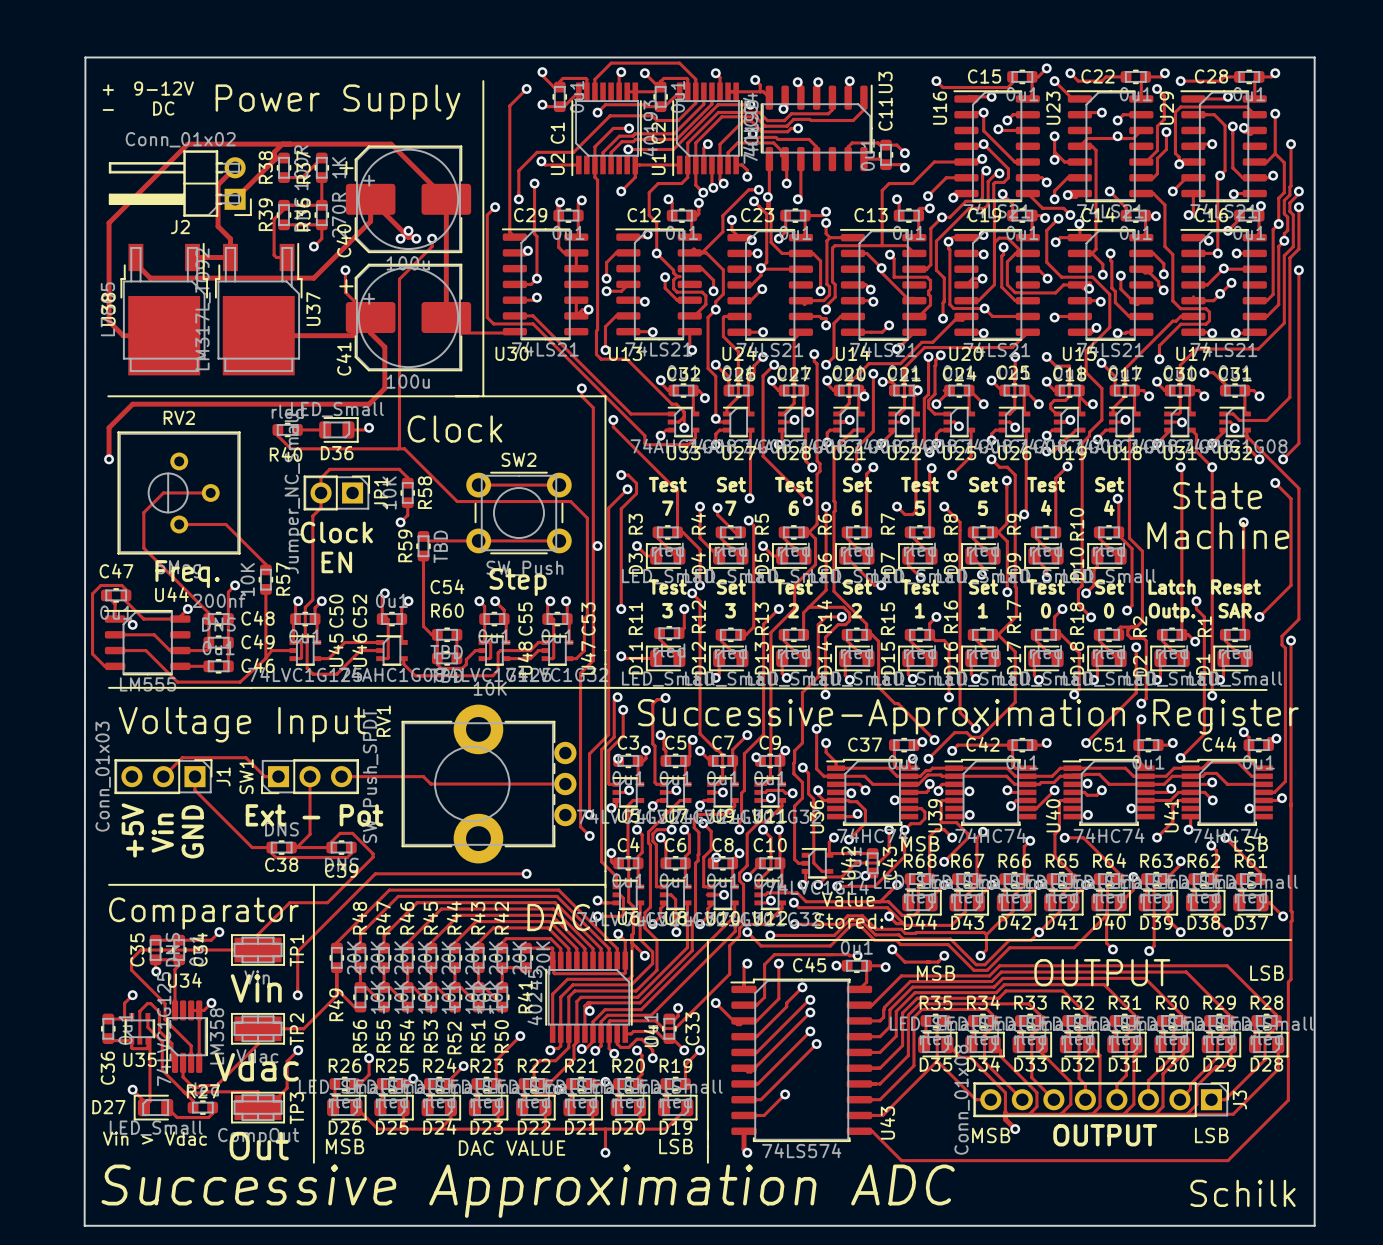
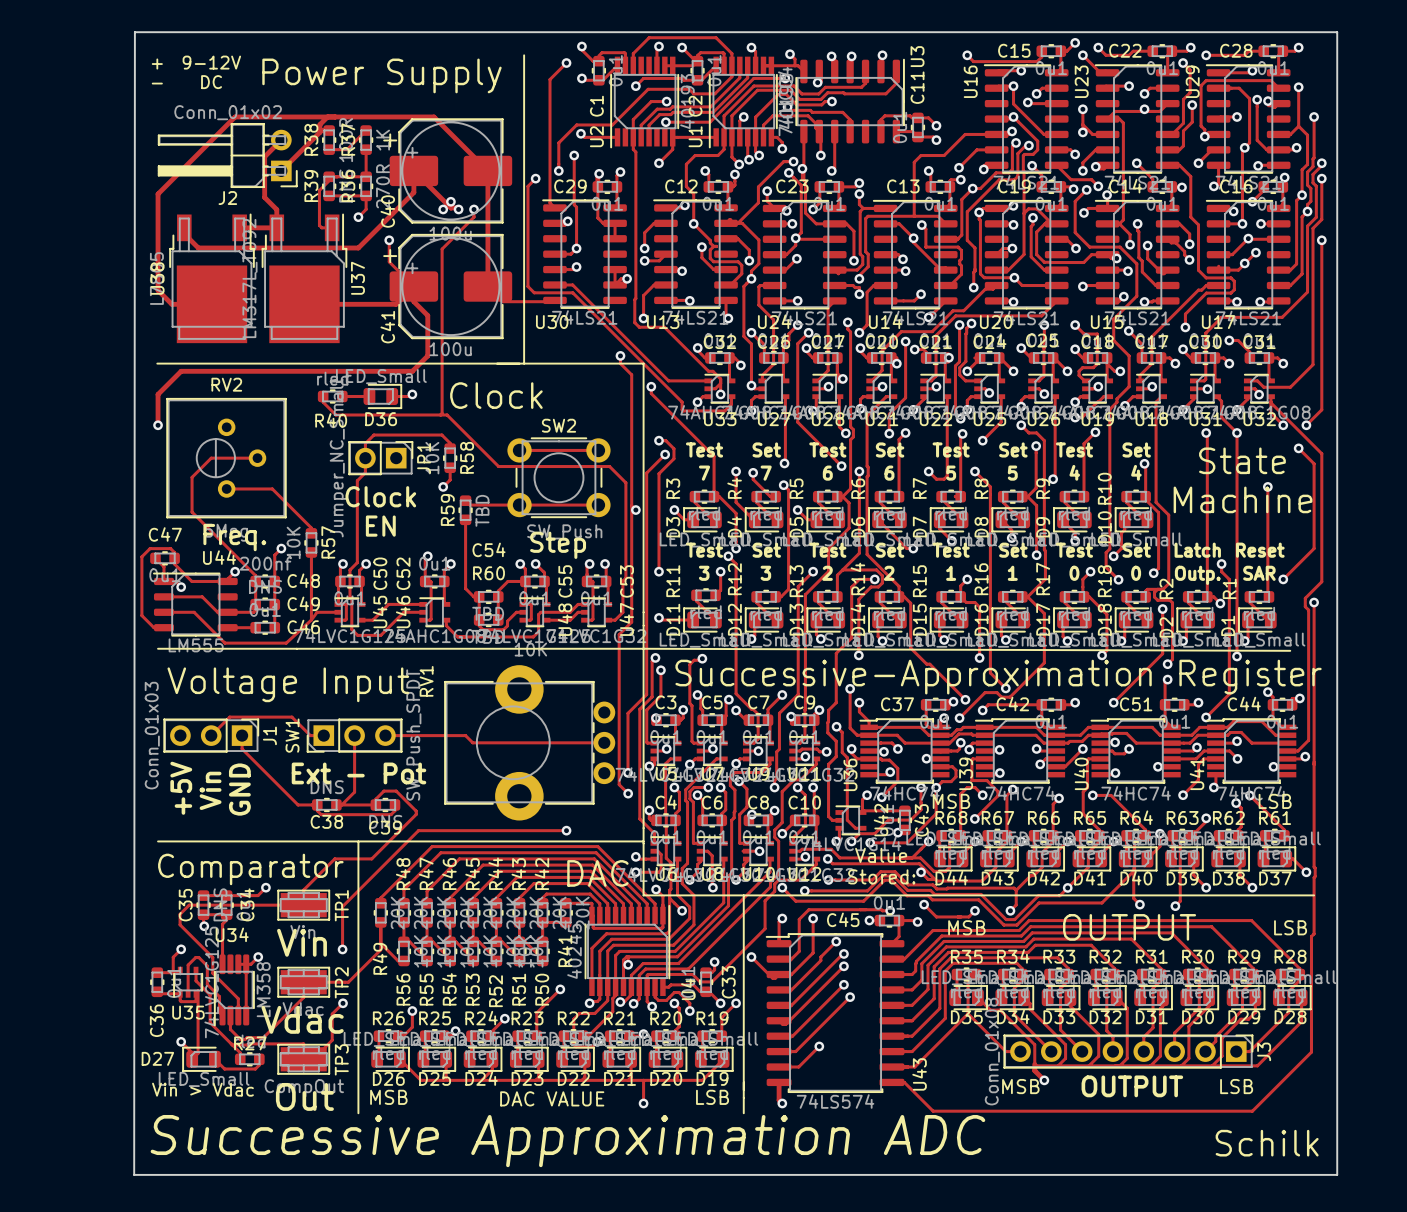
track: none -> (525, 581) (507, 581) (498, 591) (498, 596)

